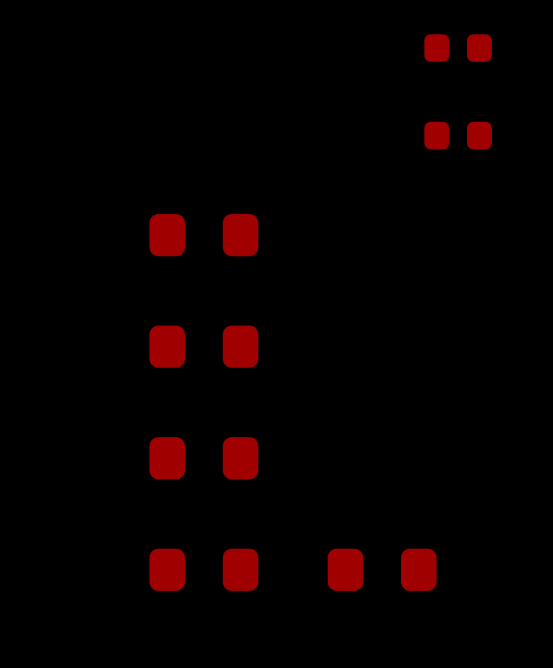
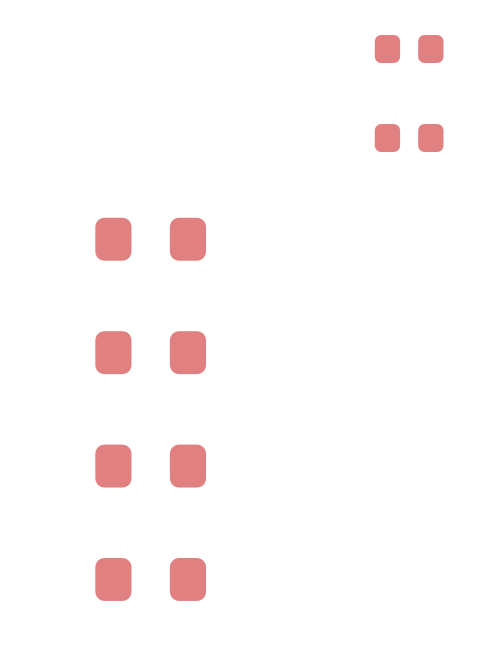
part: (382, 569) -> none

